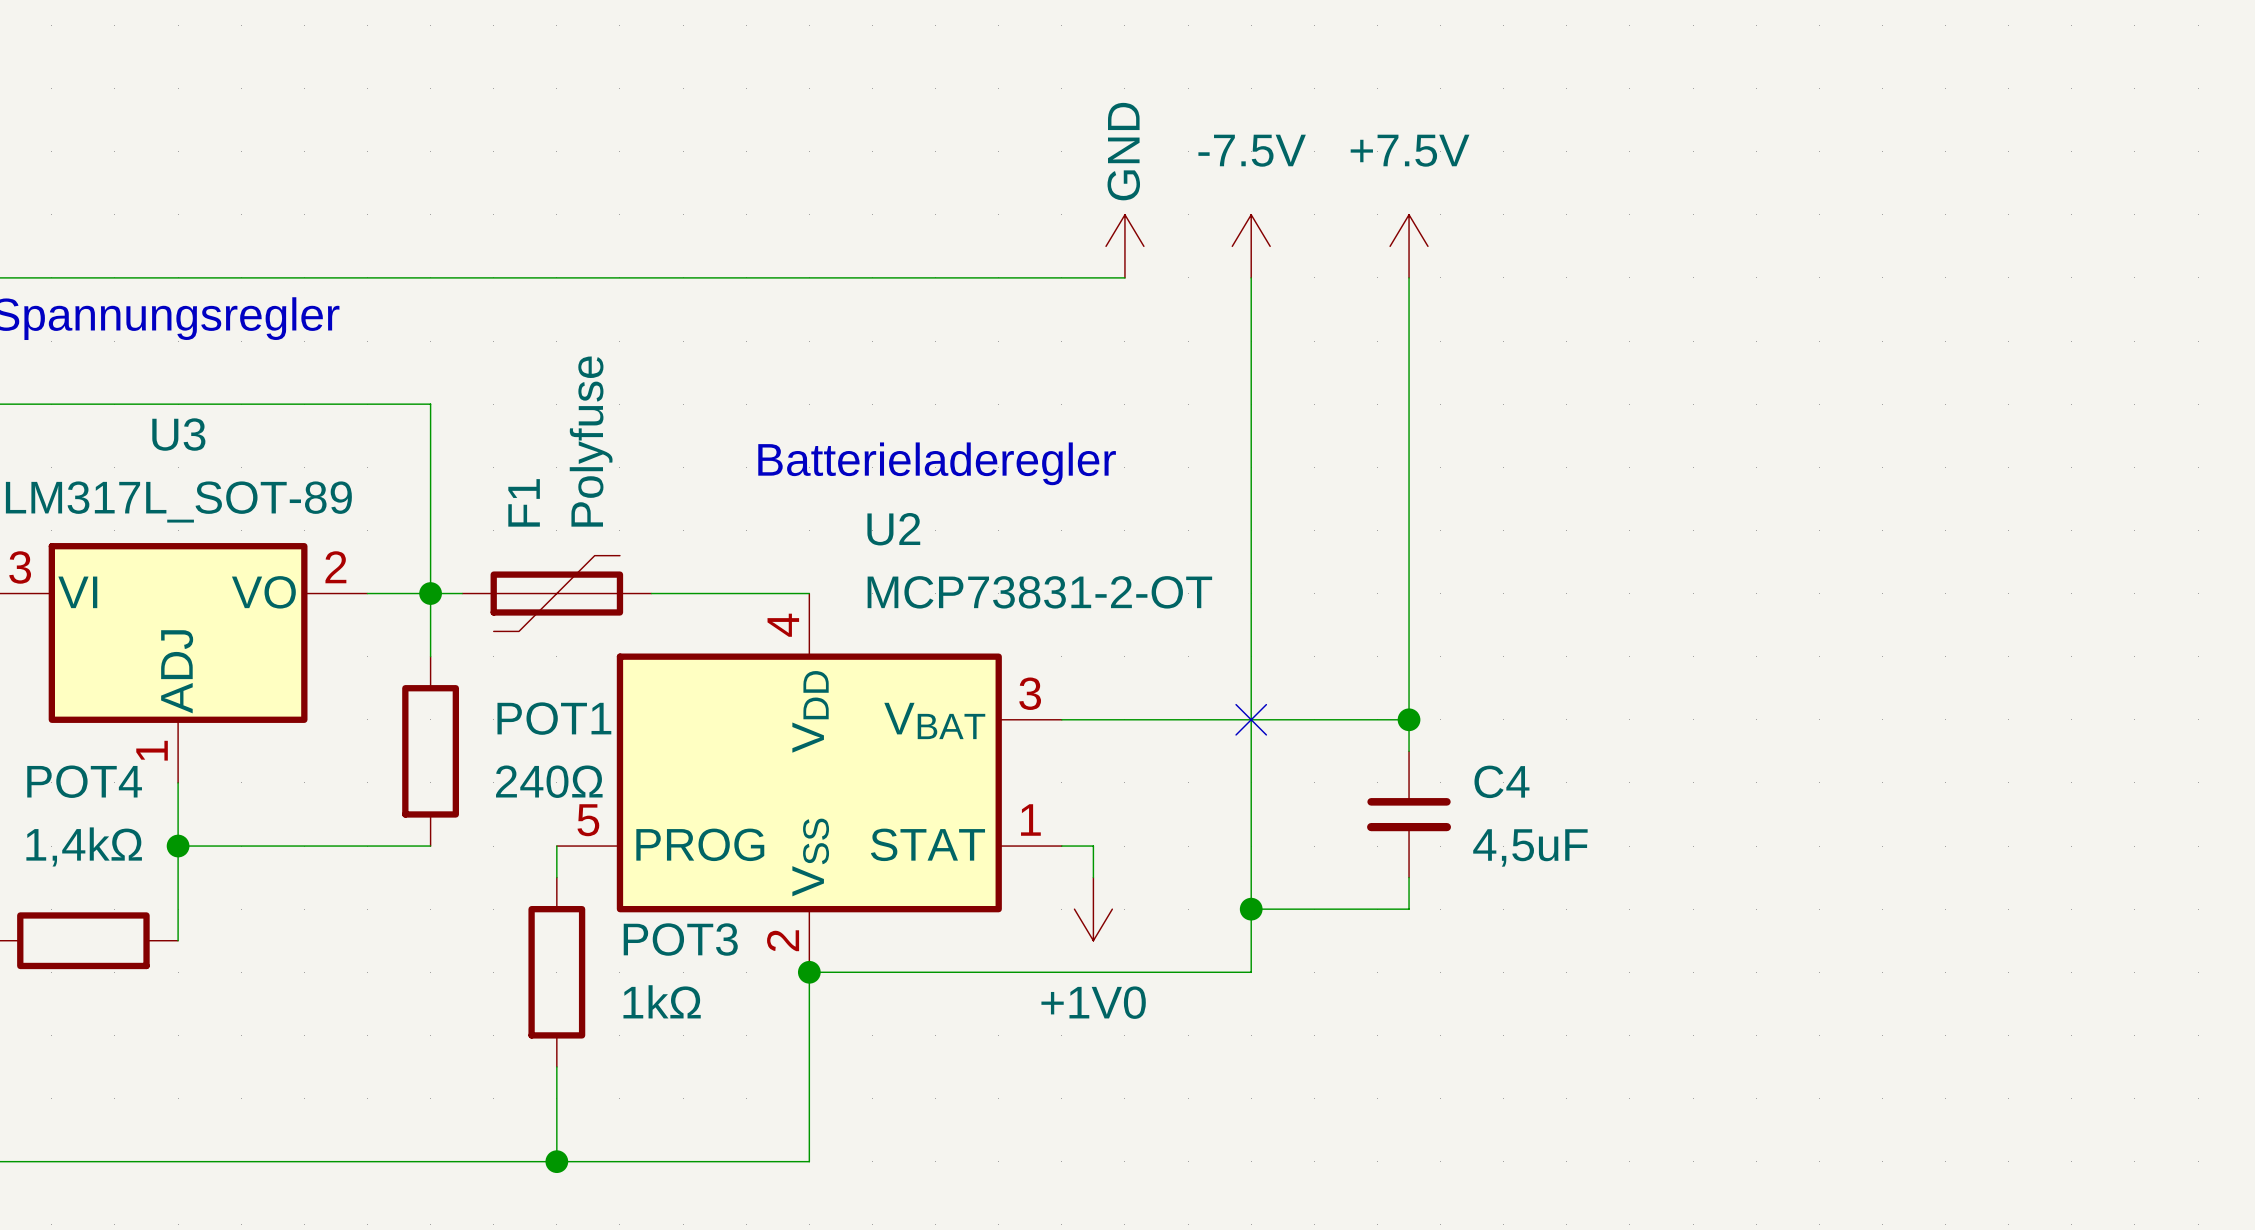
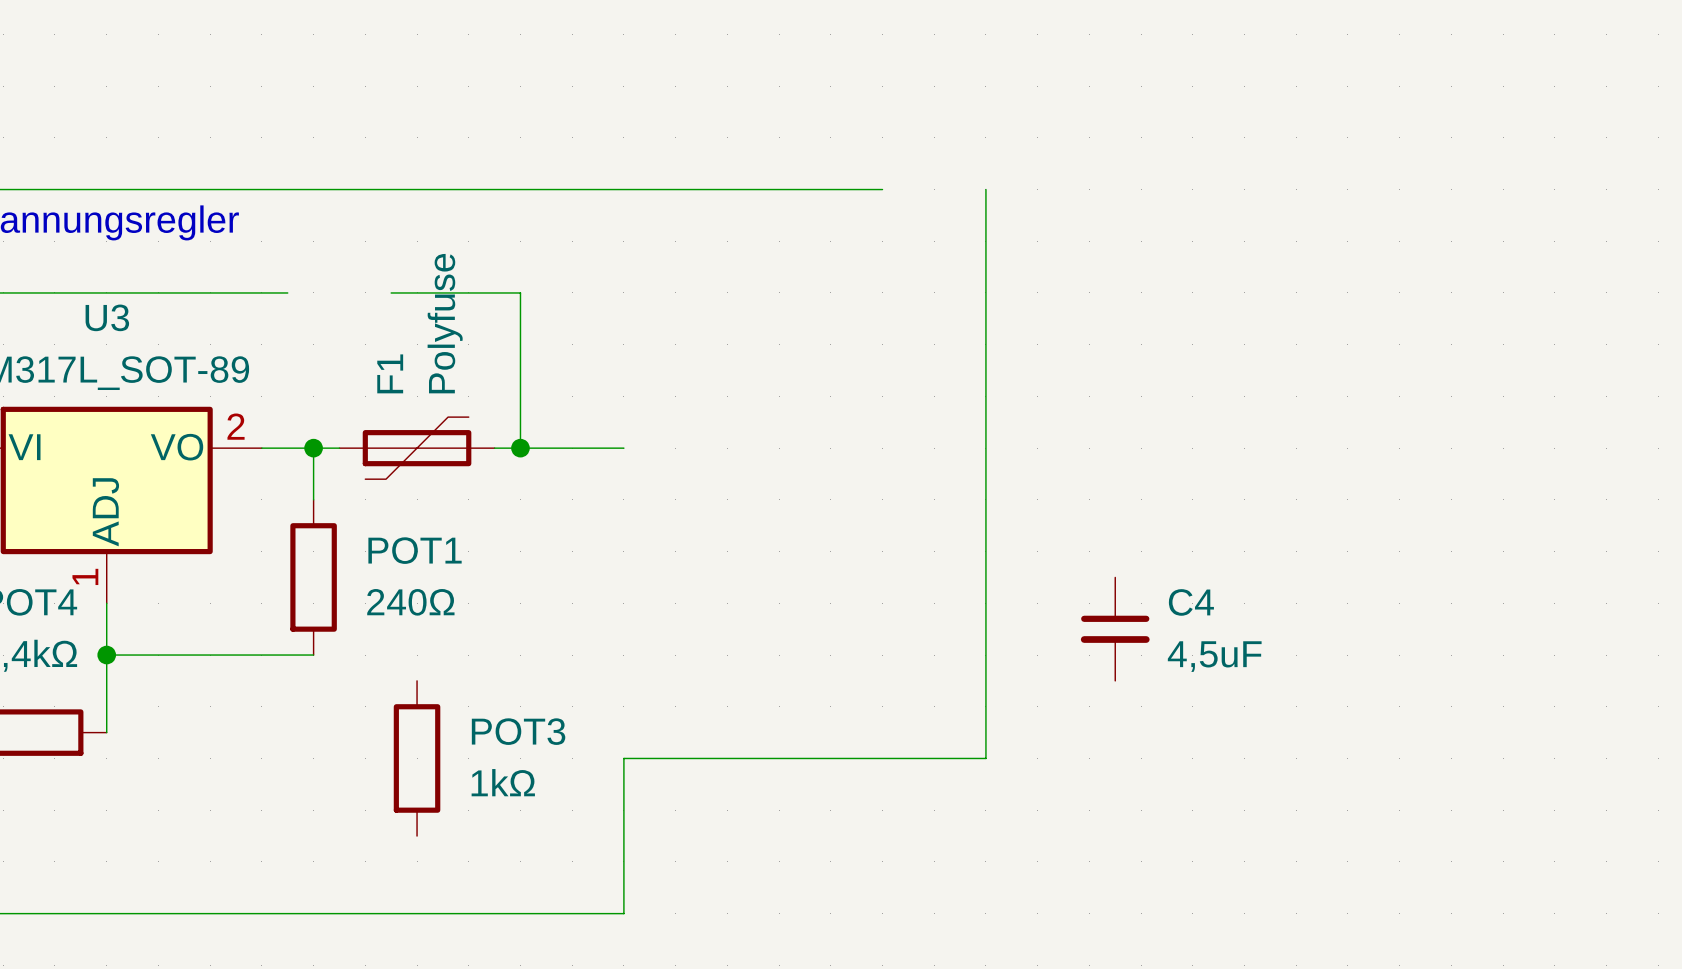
power symbol: GND (1124, 246) -> none
power symbol: -7.5V (1251, 246) -> none
power symbol: +7.5V (1409, 246) -> none
wire: (1409, 277) (1409, 751) -> none
wire: (399, 404) (430, 404) (430, 593) -> none
wire: none -> (391, 292) (520, 292) (520, 448)
text: Batterieladeregler (937, 463) -> none
junction: none -> (520, 448)
wire: (1061, 719) (1409, 719) -> none
no-connect mark: (1251, 719) -> none
junction: (1409, 719) -> none
U2: MCP73831-2-OT (809, 782) -> none
wire: (556, 846) (556, 877) -> none
wire: (1061, 846) (1093, 846) (1093, 877) -> none
wire: (1409, 877) (1409, 909) (1251, 909) -> none
power symbol: +1V0 (1093, 909) -> none
junction: (1251, 909) -> none
junction: (809, 972) -> none
wire: (556, 1066) (556, 1161) -> none
junction: (556, 1161) -> none

